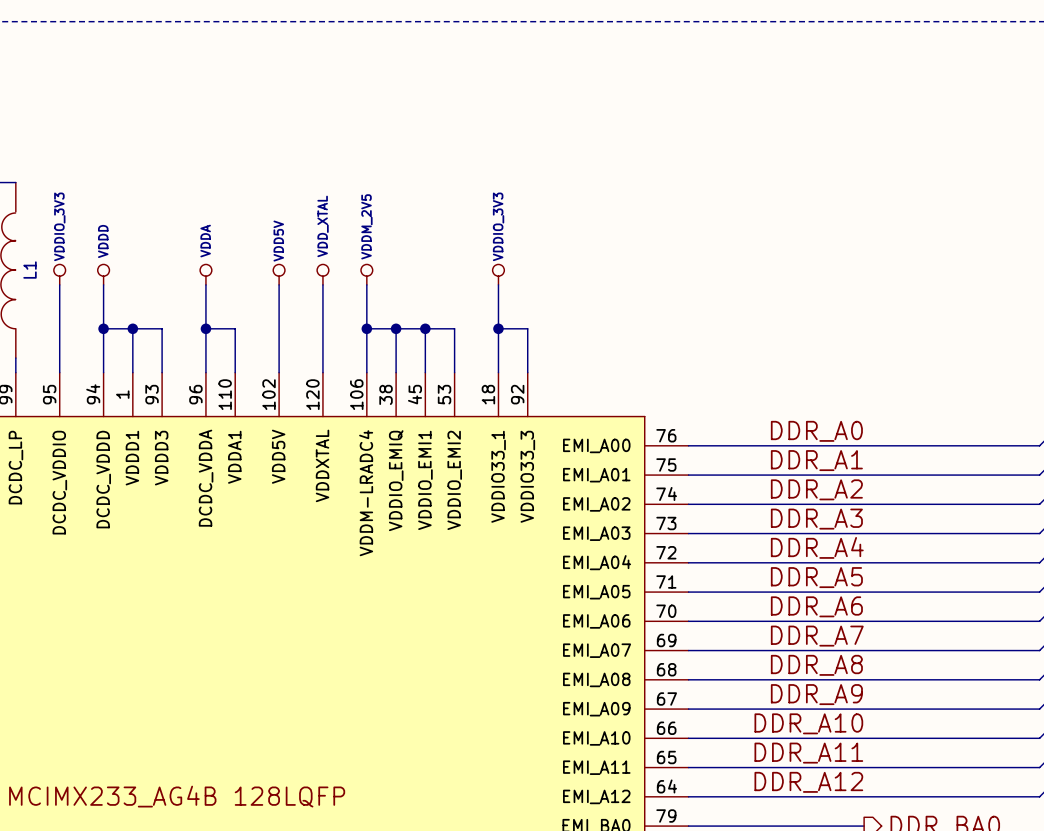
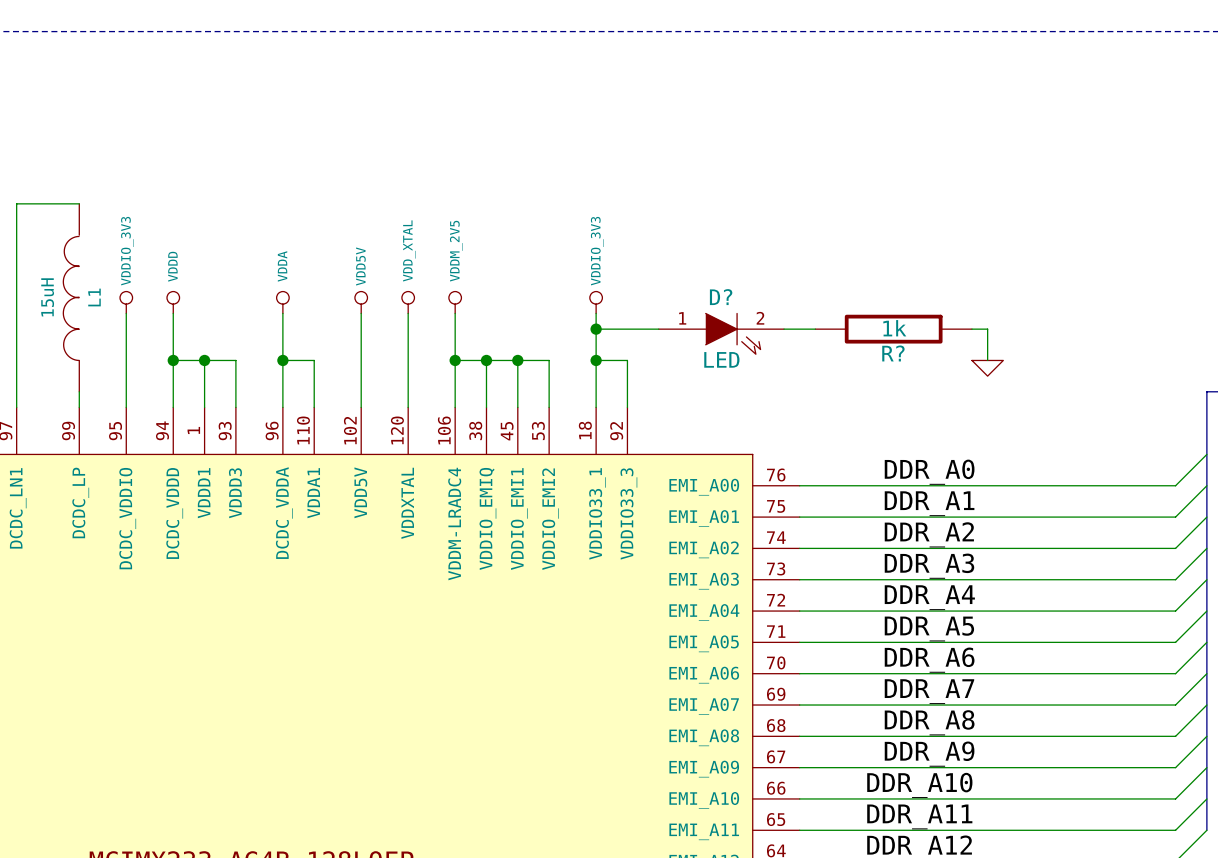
wire: none -> (596, 329) (658, 329)
junction: none -> (596, 329)
wire: none -> (784, 329) (815, 329)
R?: none -> 1k (893, 329)
wire: none -> (971, 329) (987, 329) (987, 360)
D?: none -> LED (721, 333)
power symbol: none -> (987, 368)

